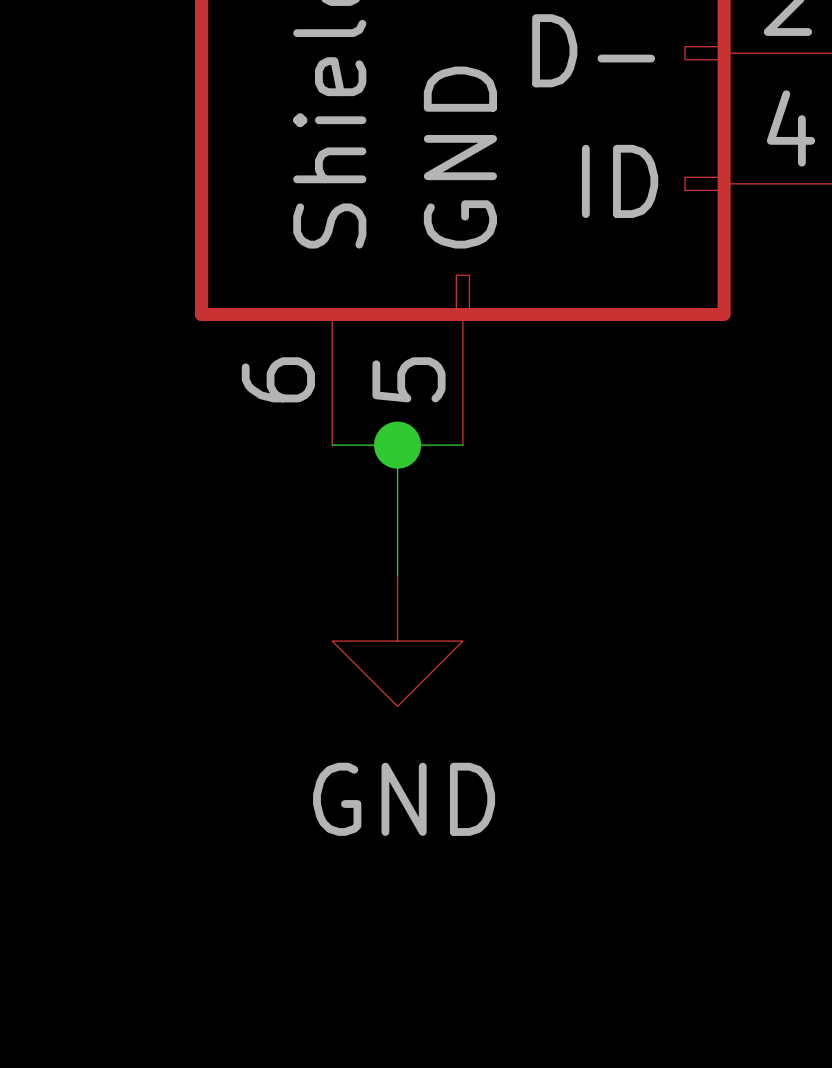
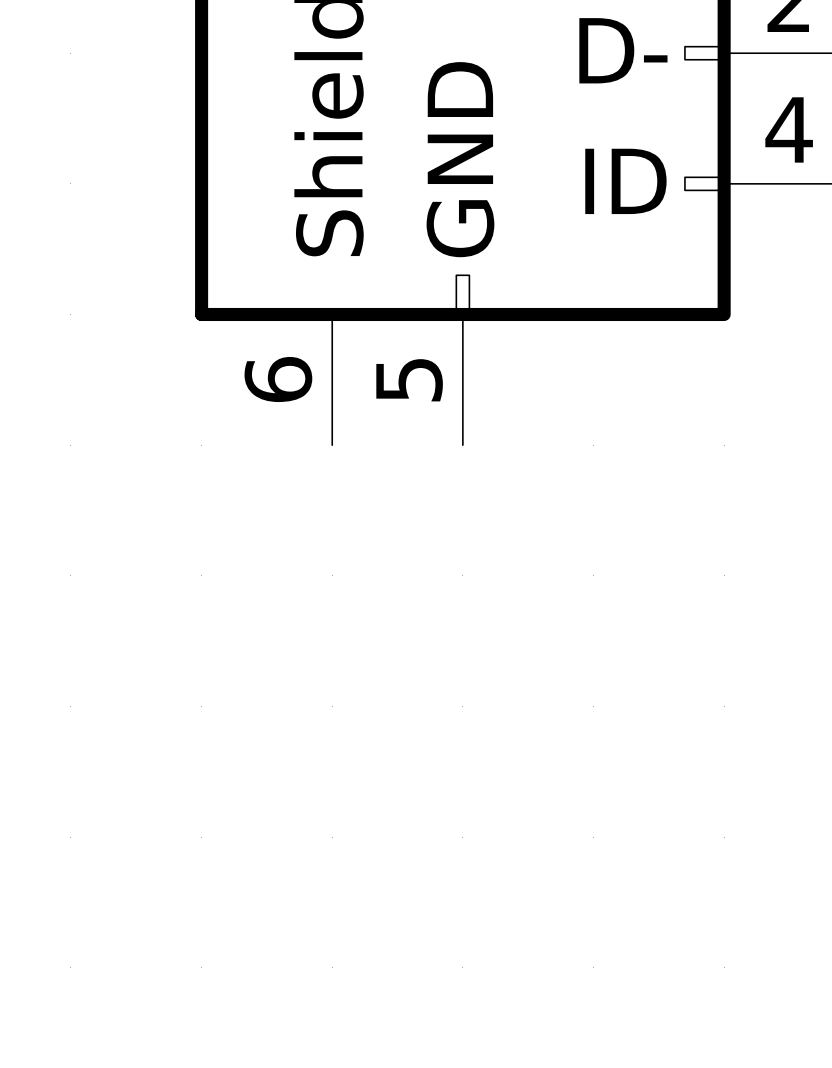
wire: (332, 445) (462, 445) -> none
wire: (397, 445) (397, 575) -> none
junction: (397, 445) -> none
power symbol: GND (397, 641) -> none

